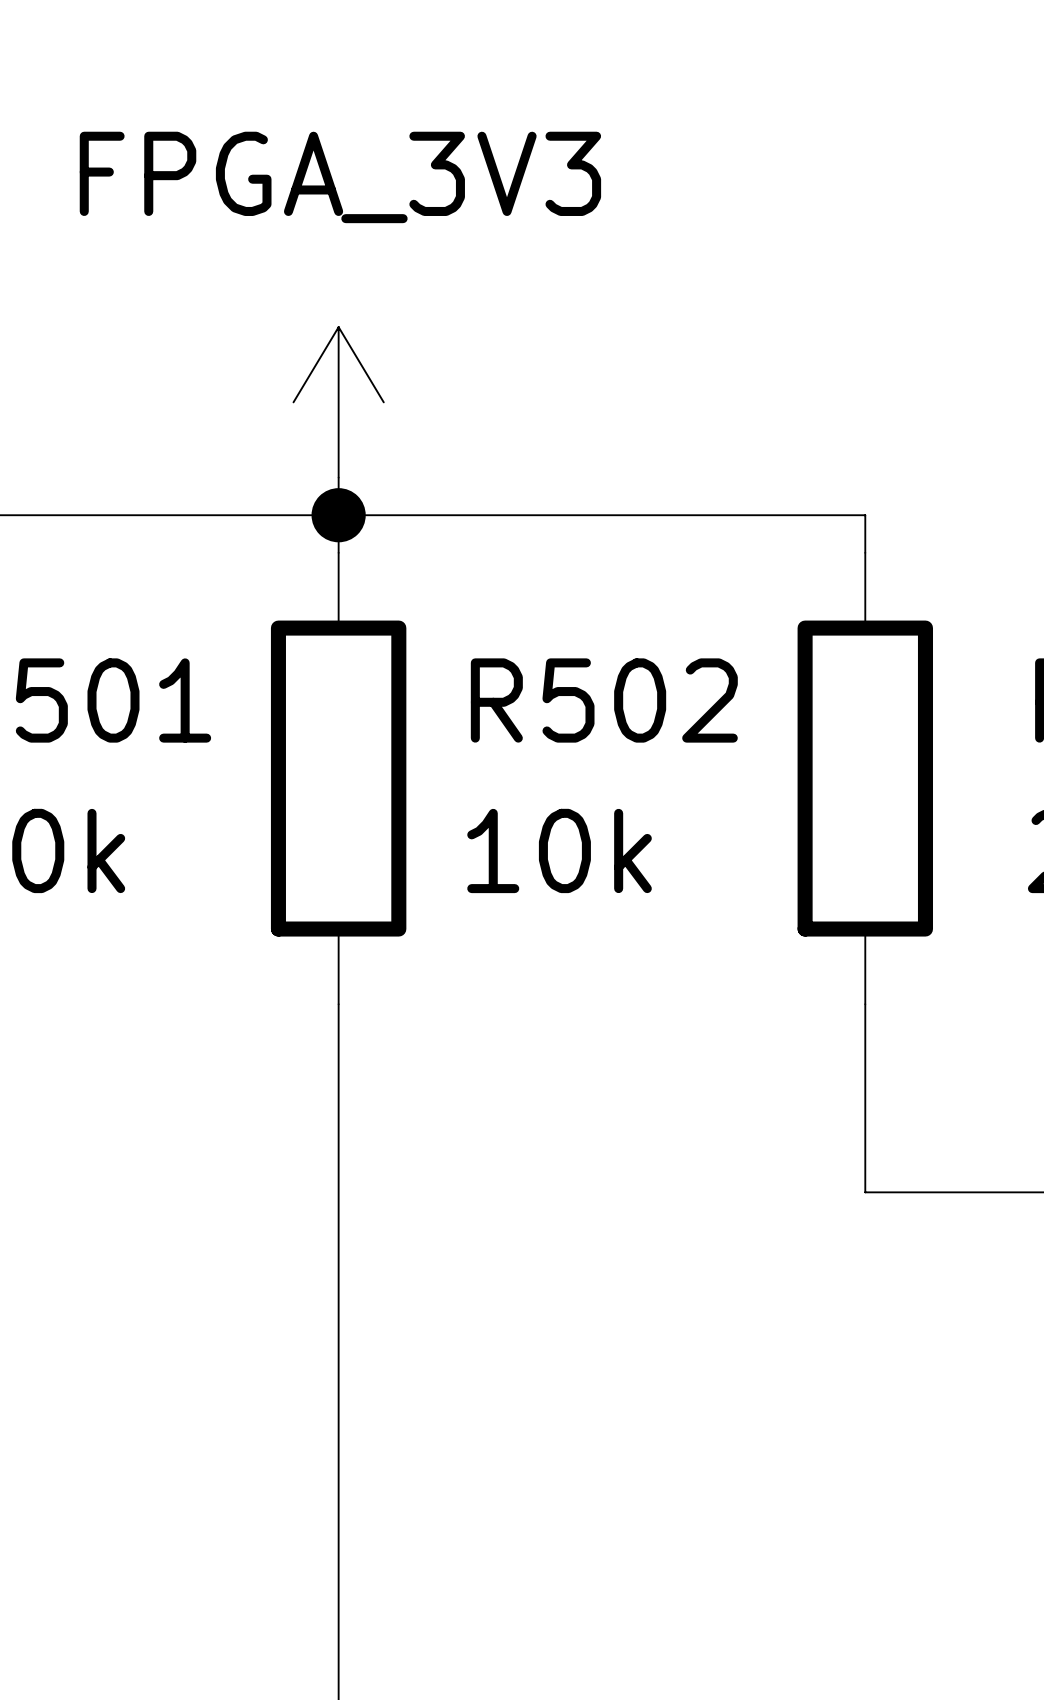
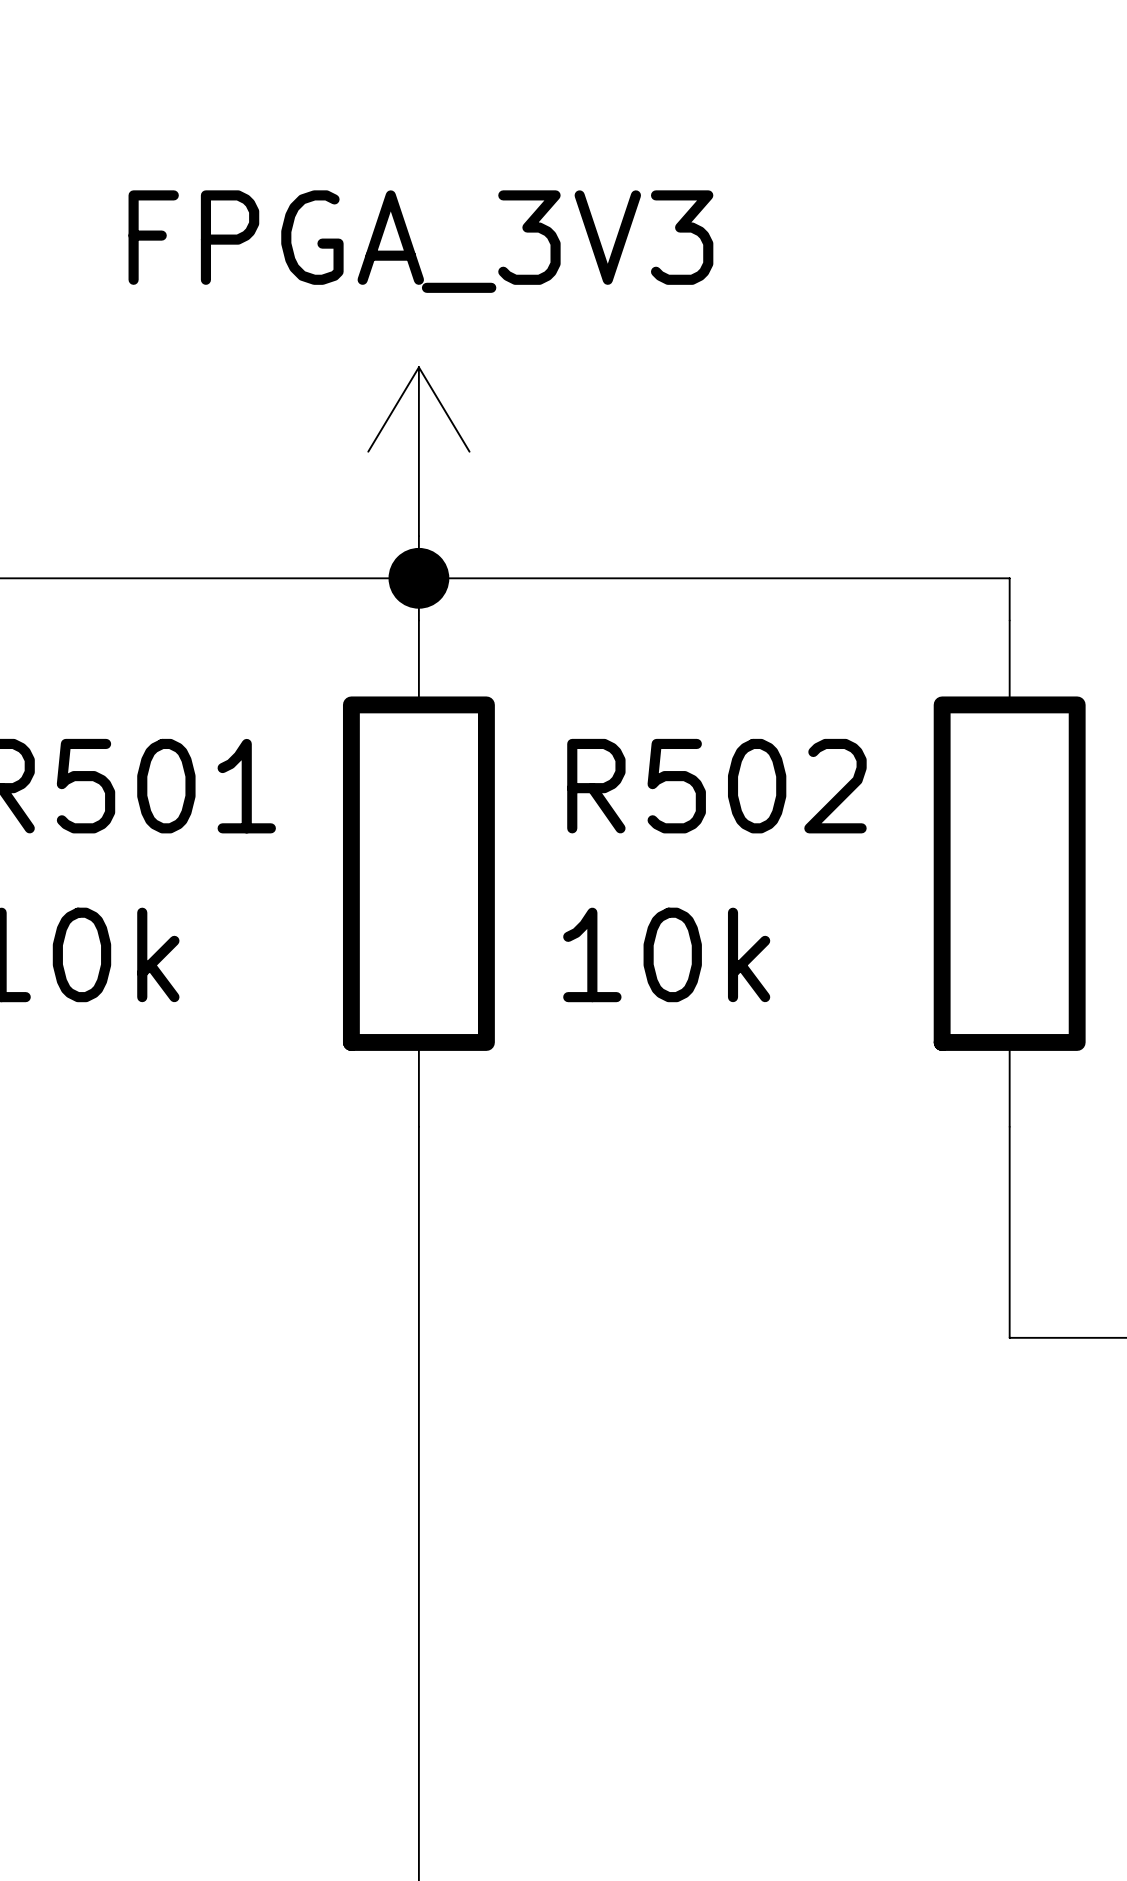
power symbol text position: FPGA_3V3 (340, 177) -> FPGA_3V3 (420, 241)

